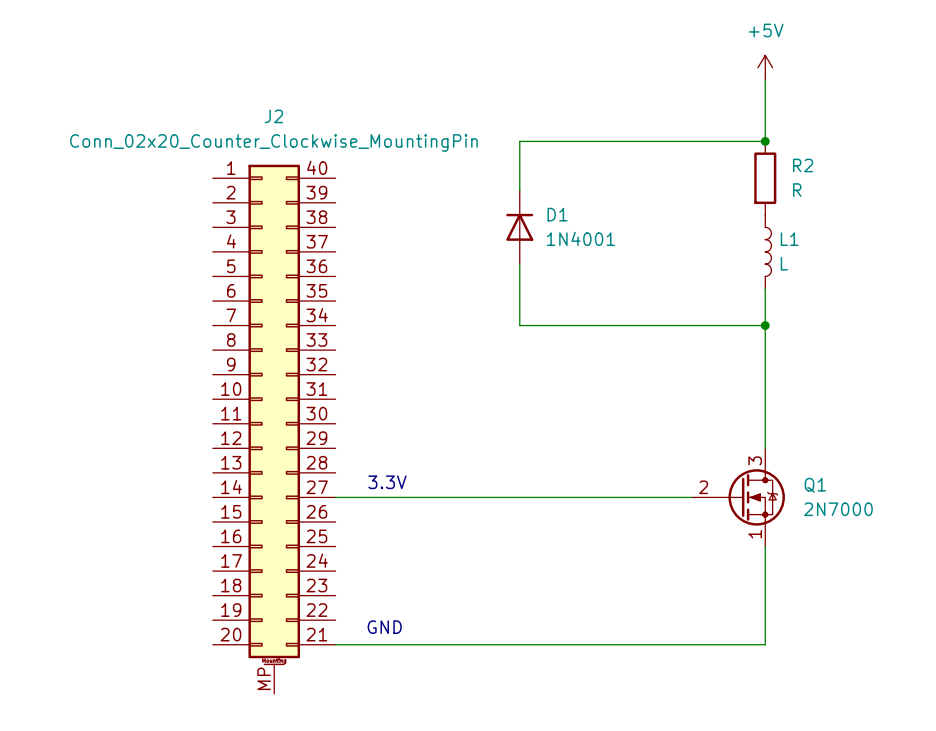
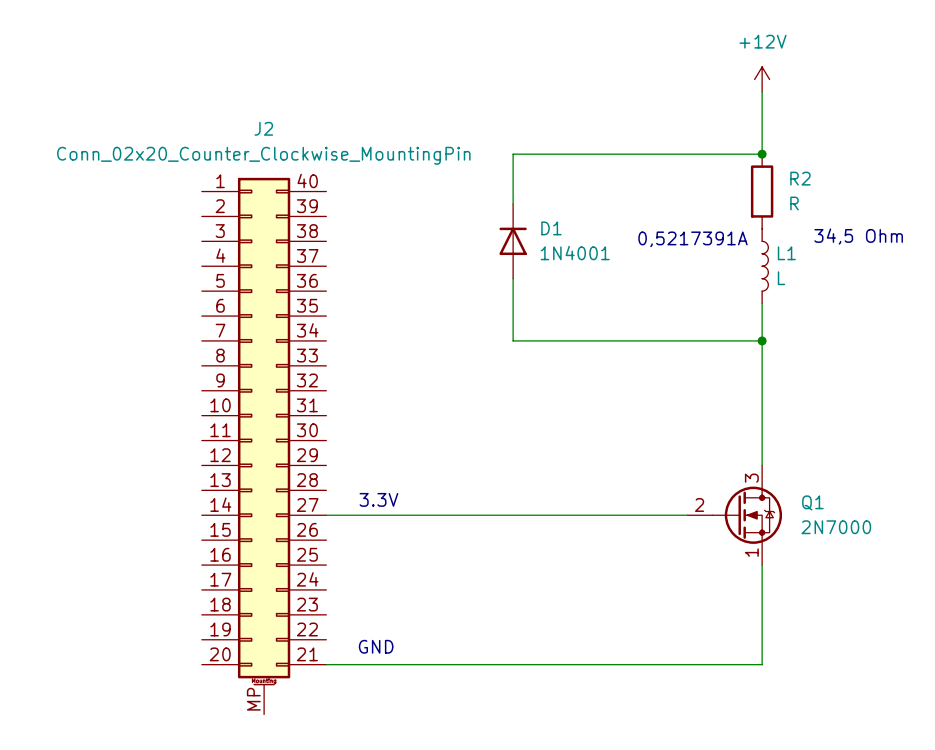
power symbol: +5V (765, 67) -> +12V (762, 79)
text: none -> 34,5 Ohm (858, 236)
text: none -> 0,5217391A (692, 239)

